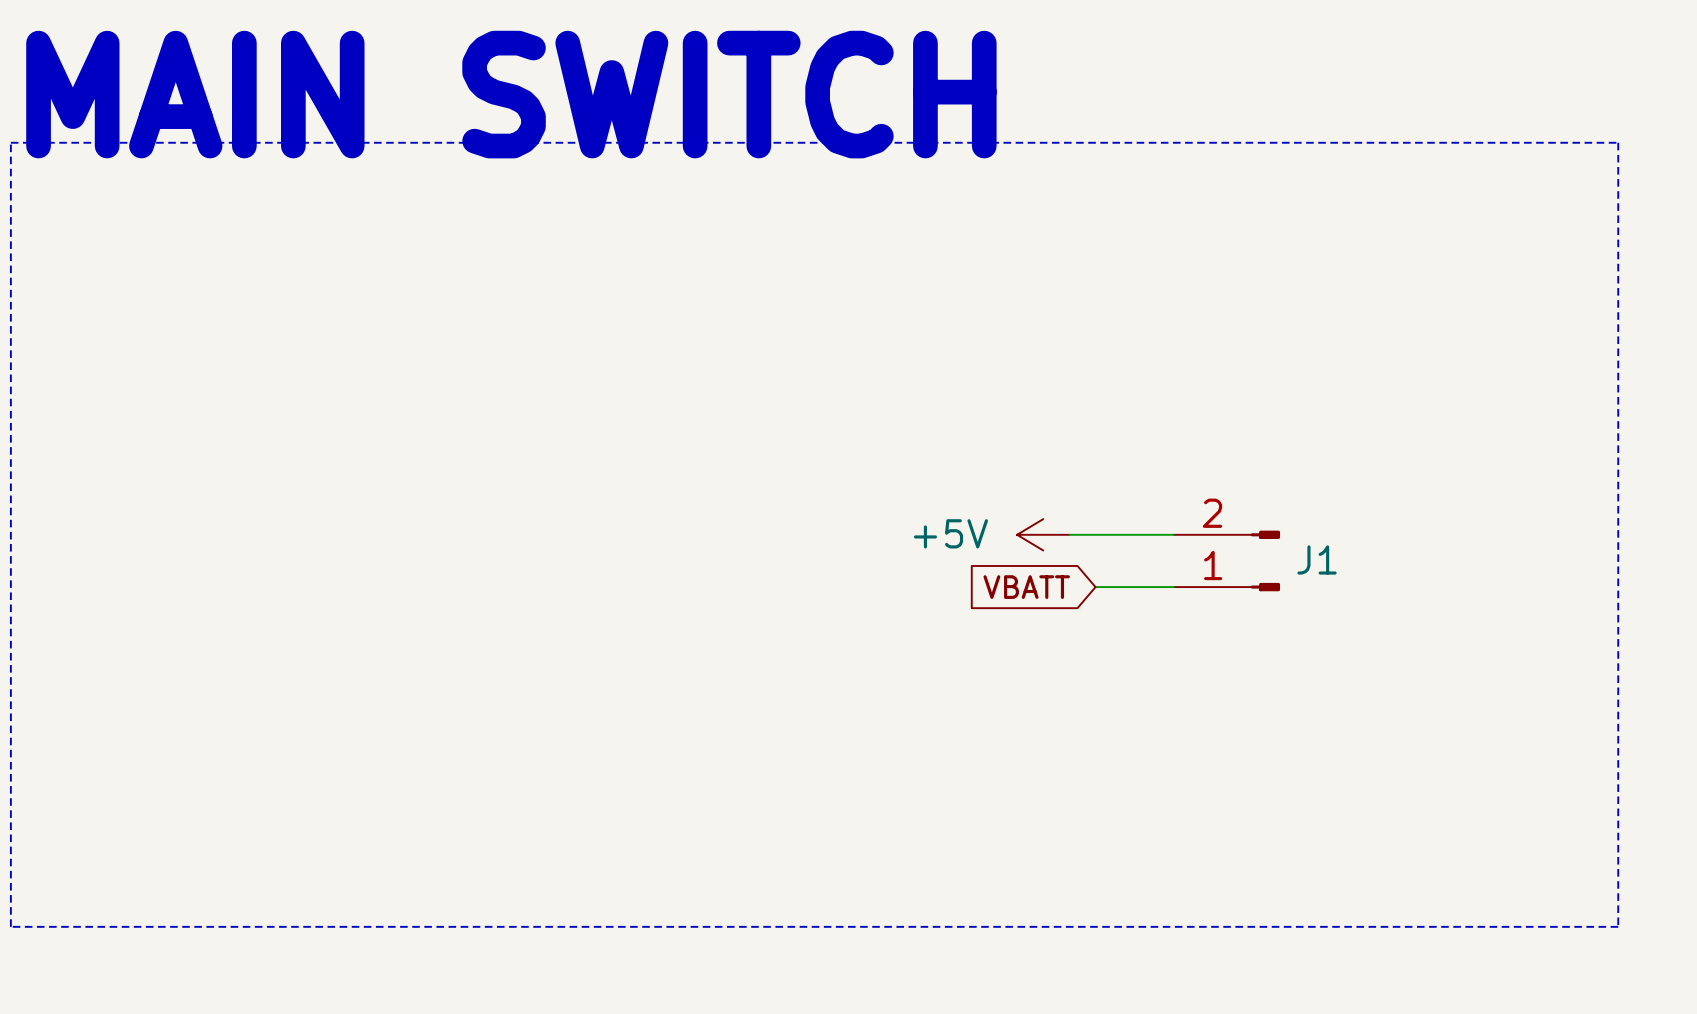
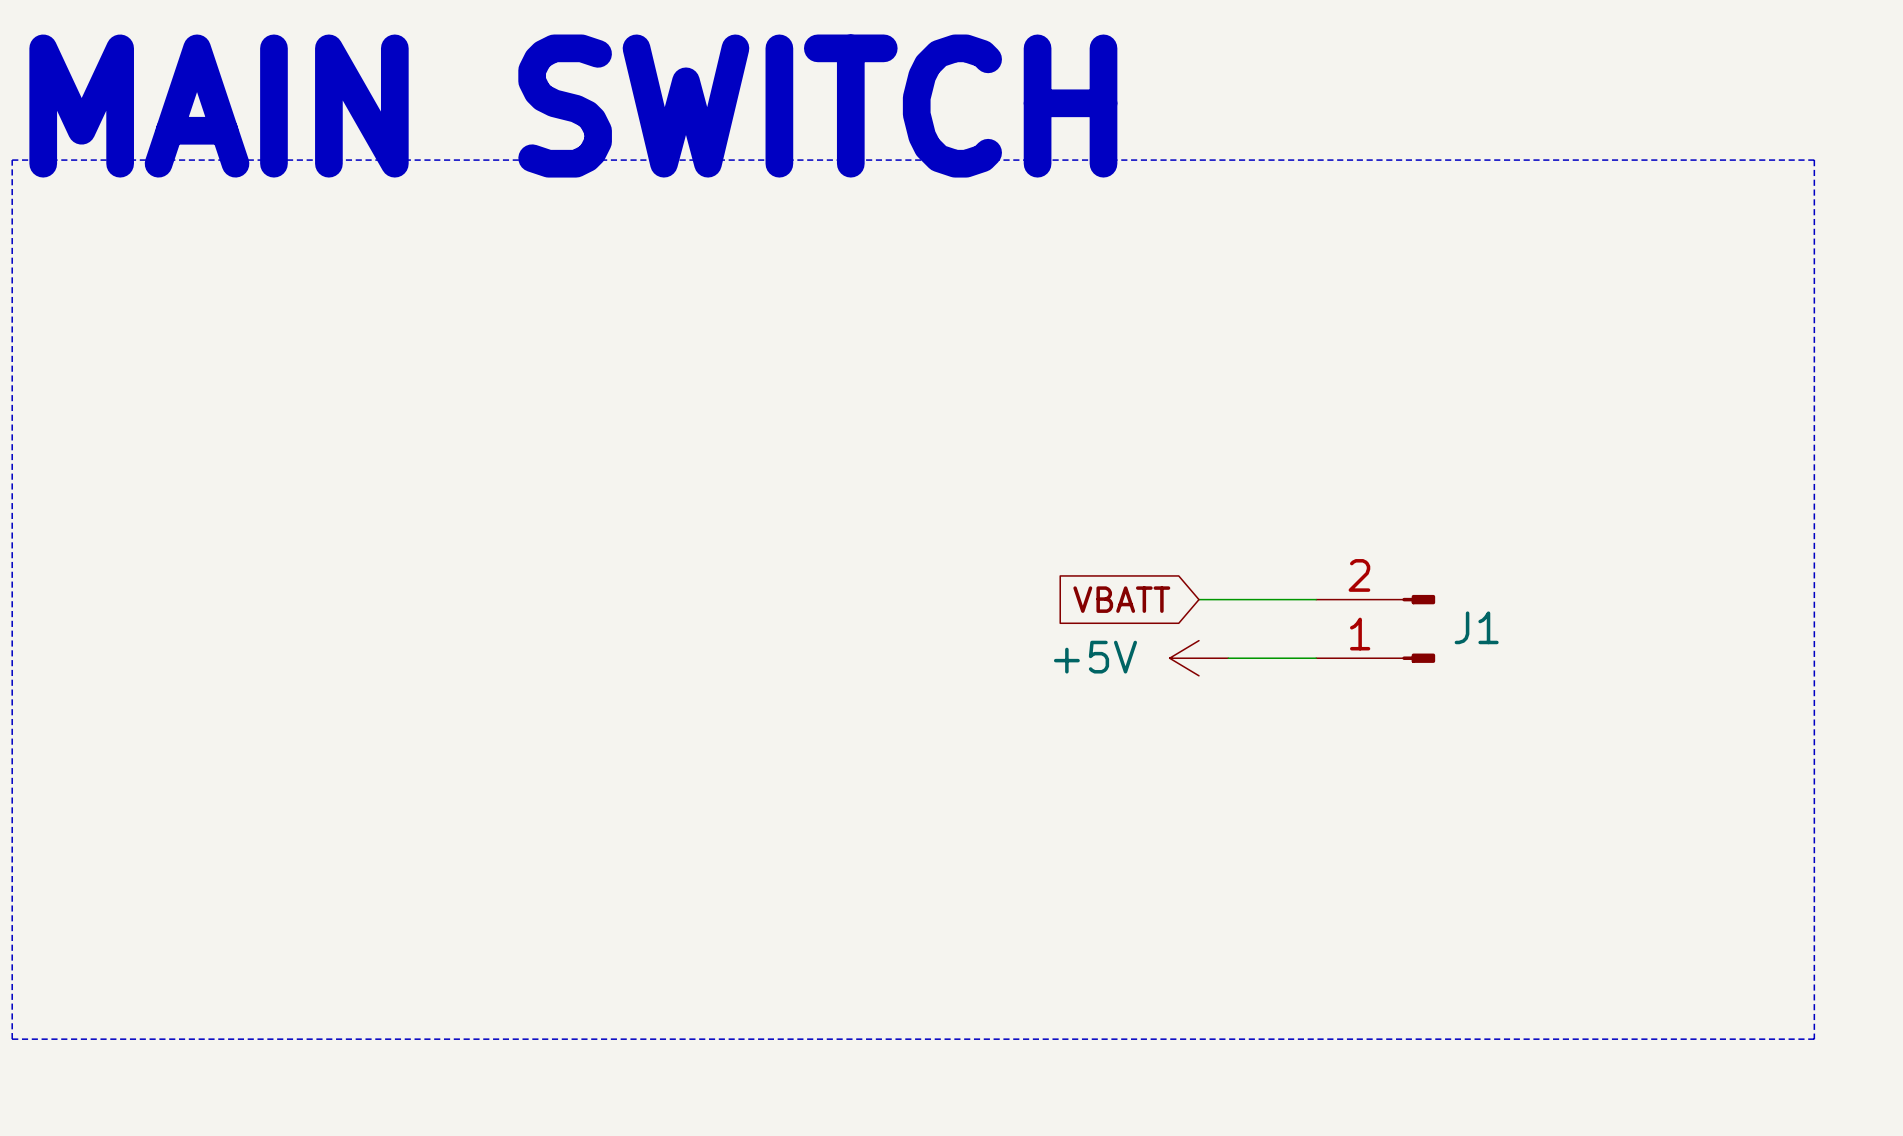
power symbol position: +5V (1043, 534) -> +5V (1198, 658)
global label position: VBATT (1026, 587) -> VBATT (1121, 599)

